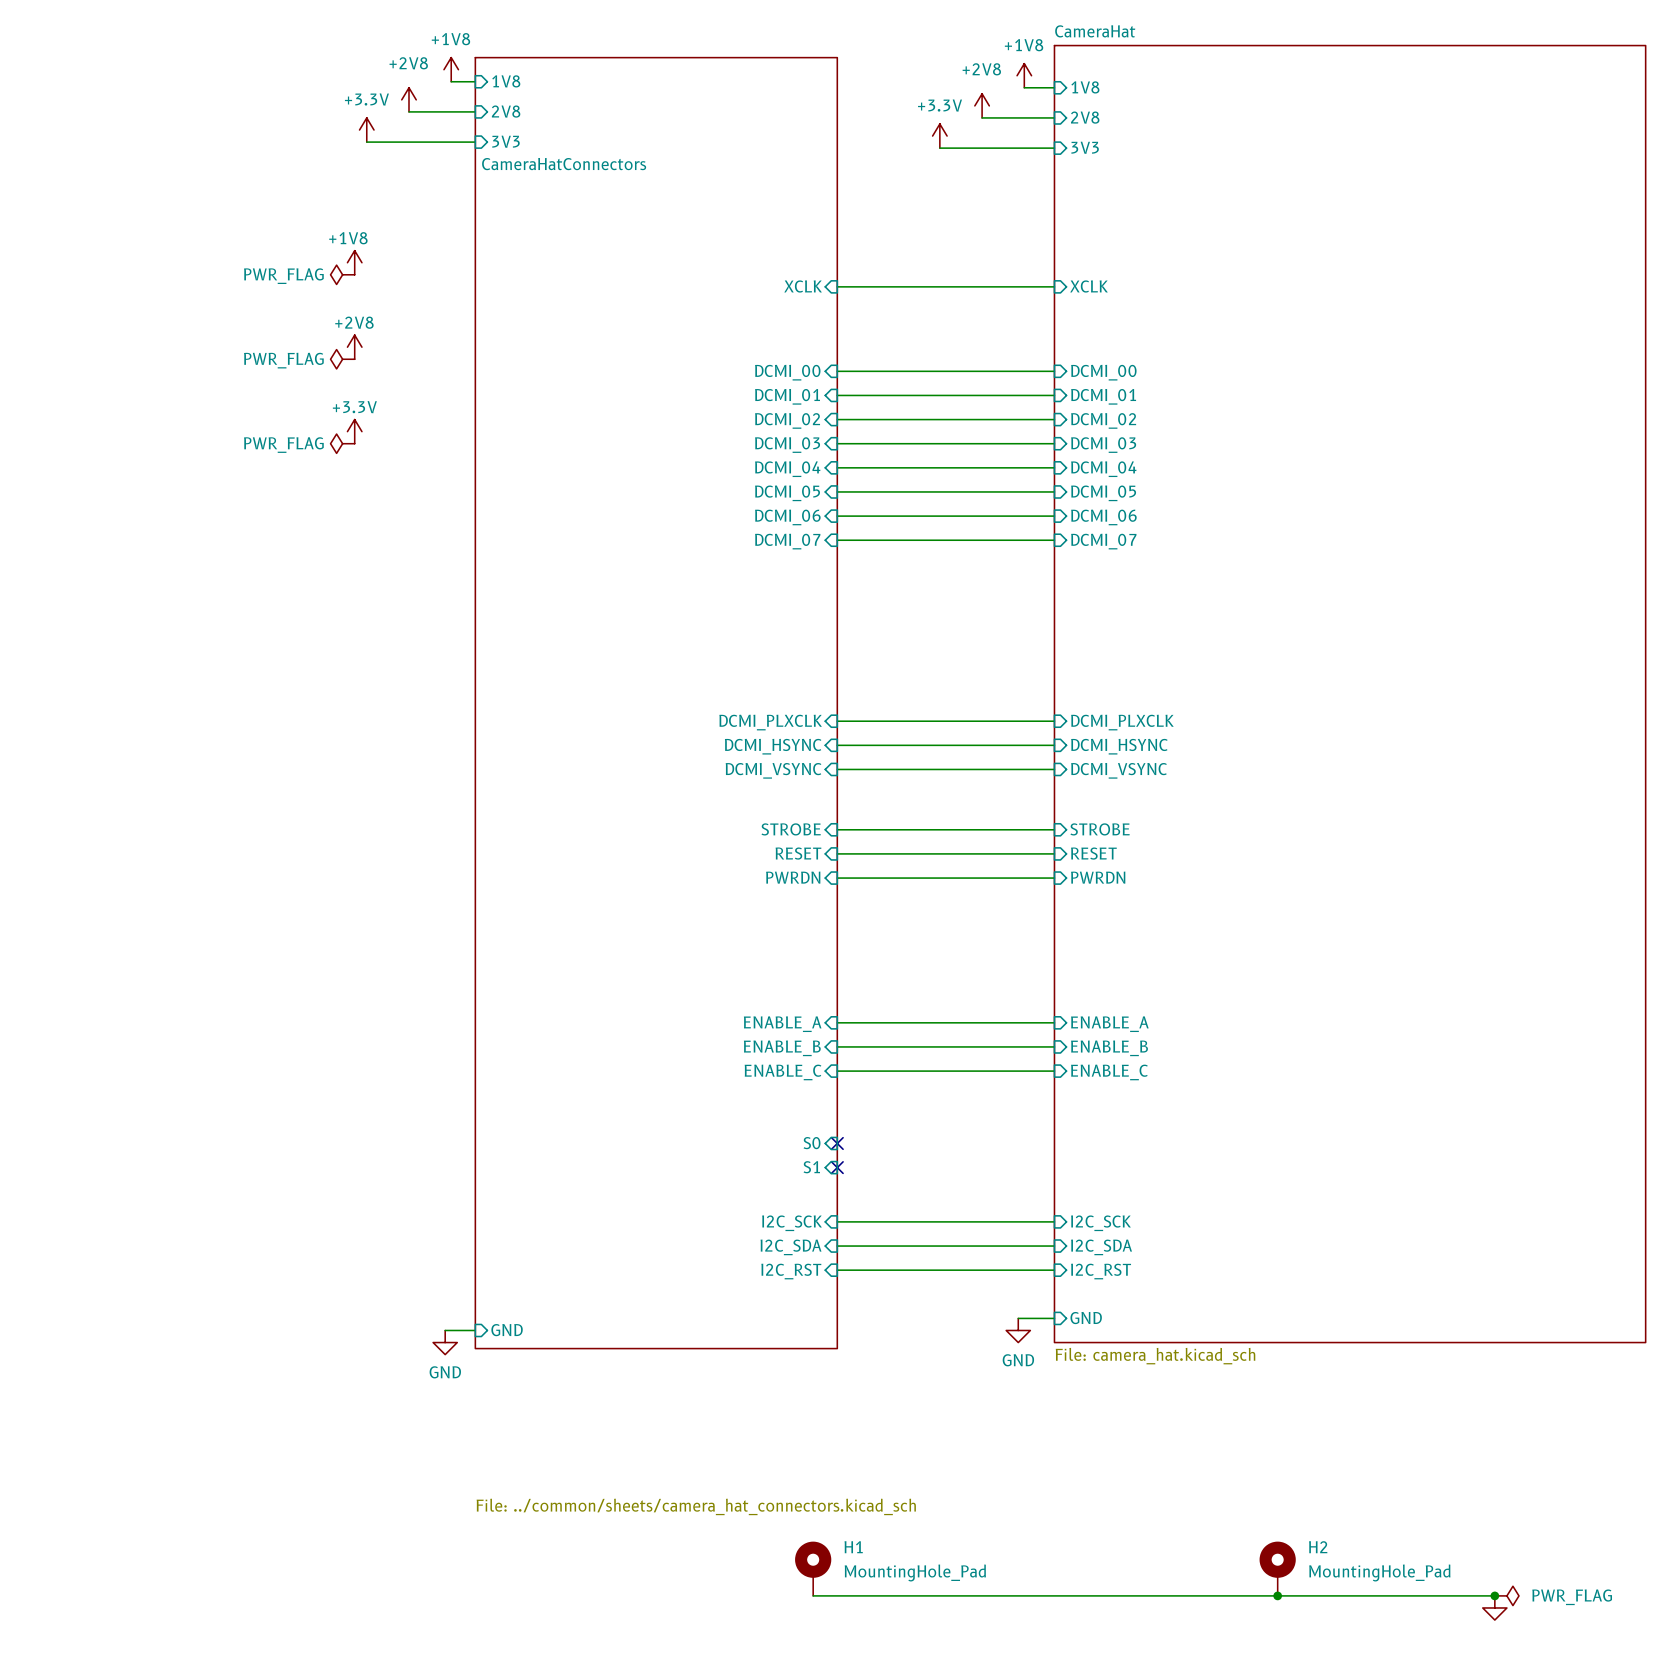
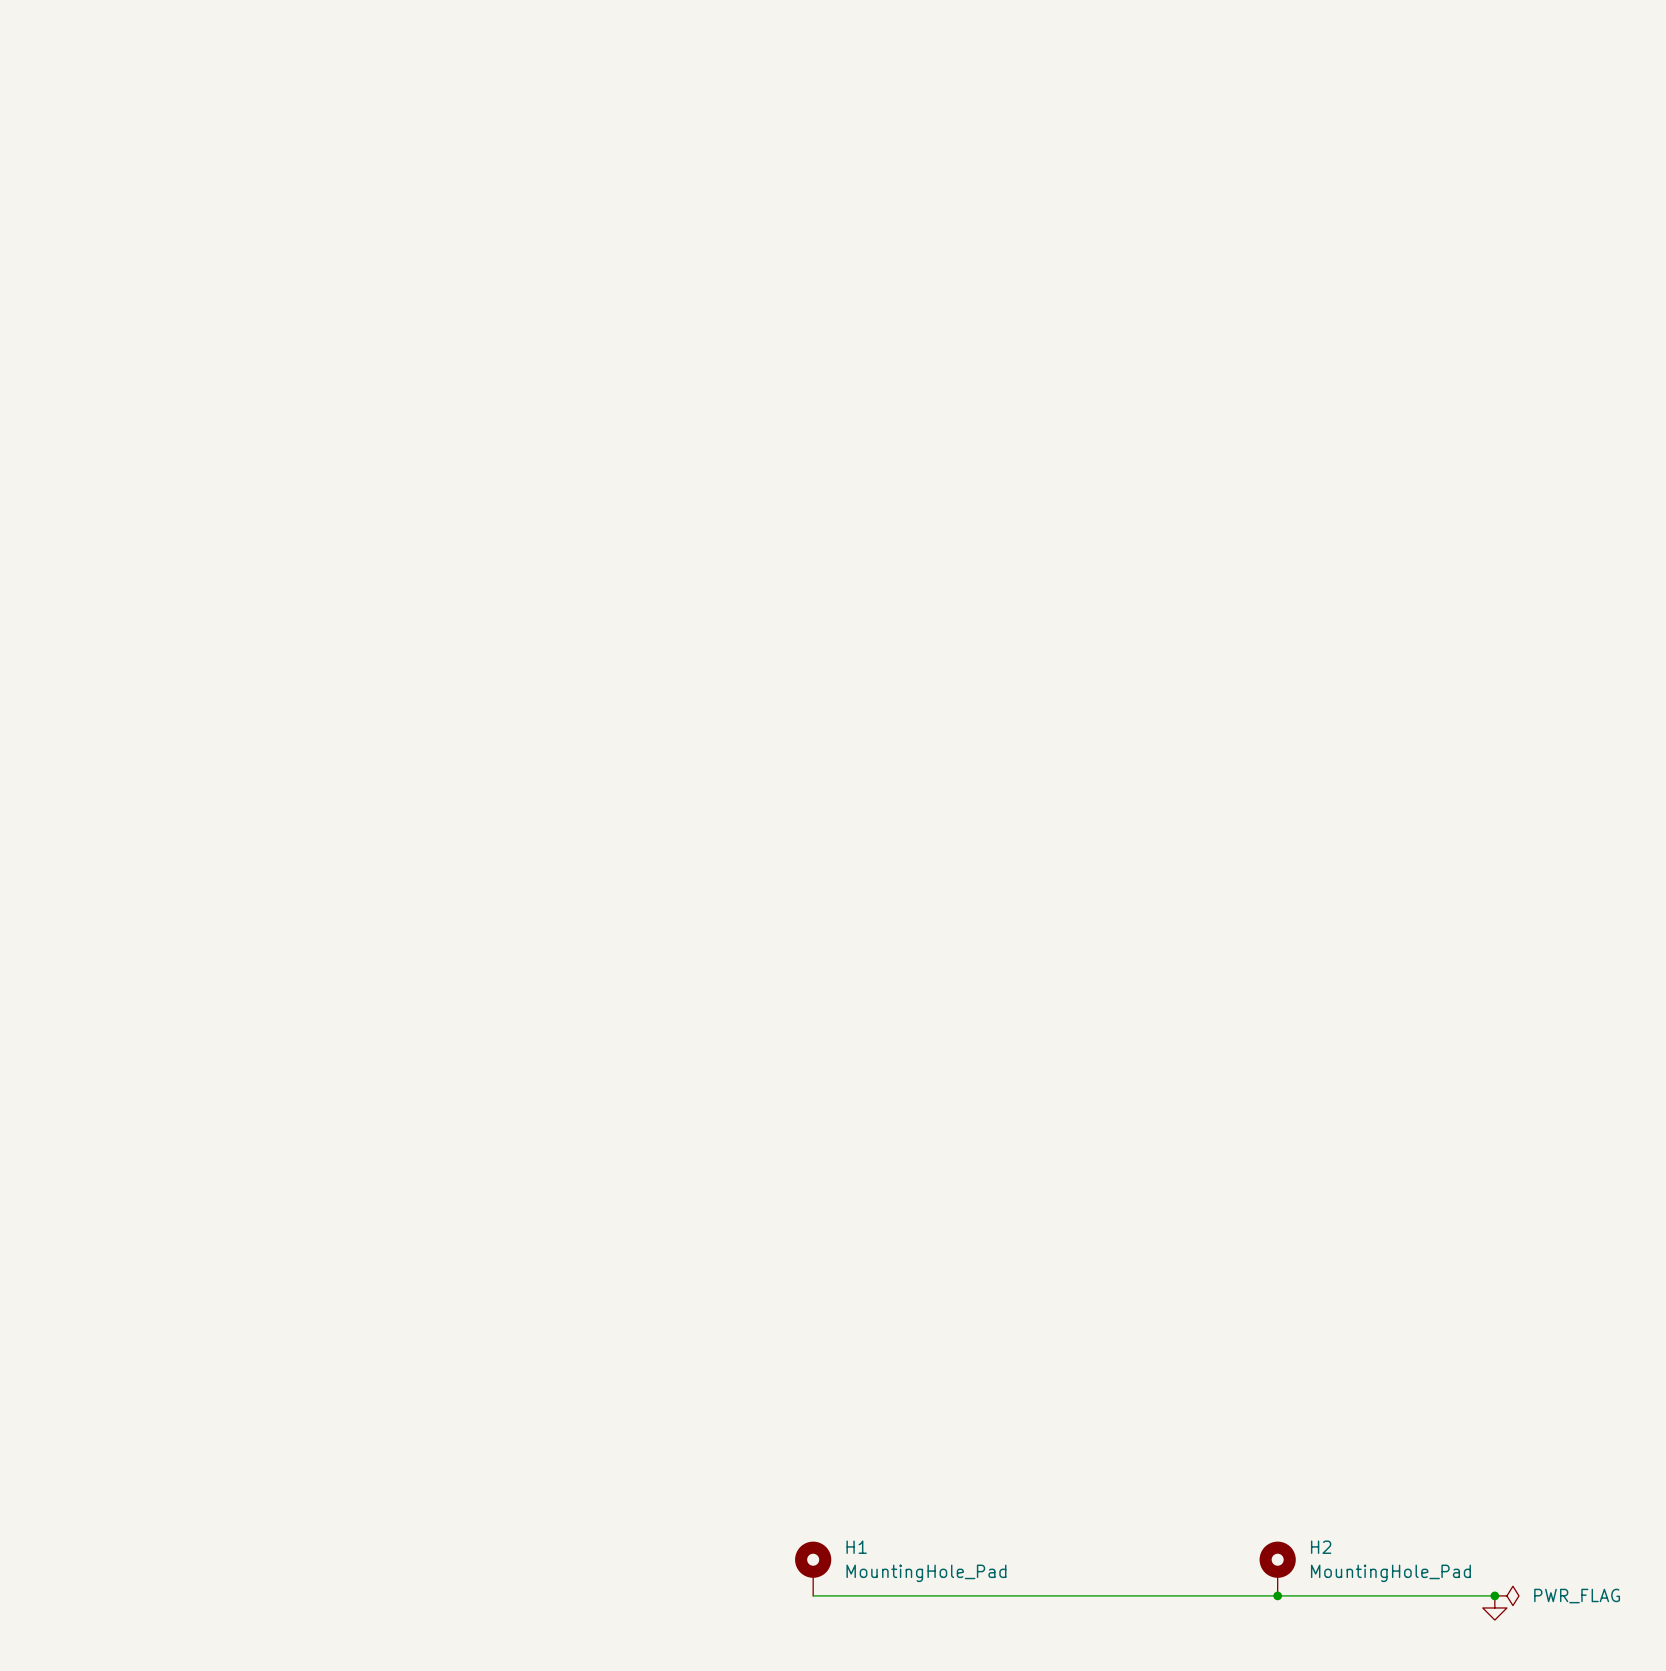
power symbol: +1V8 (451, 69) -> none
power symbol: +1V8 (1024, 75) -> none
wire: (451, 81) (475, 81) -> none
sheet pin: 1V8 (506, 81) -> none
wire: (1024, 87) (1054, 87) -> none
sheet pin: 1V8 (1085, 87) -> none
power symbol: +2V8 (408, 99) -> none
power symbol: +2V8 (982, 105) -> none
wire: (408, 111) (475, 111) -> none
sheet pin: 2V8 (506, 111) -> none
wire: (982, 117) (1054, 117) -> none
sheet pin: 2V8 (1085, 117) -> none
power symbol: +3.3V (366, 130) -> none
power symbol: +3.3V (939, 136) -> none
sheet pin: 3V3 (505, 141) -> none
wire: (366, 142) (475, 142) -> none
sheet pin: 3V3 (1085, 147) -> none
wire: (939, 148) (1054, 148) -> none
power symbol: +1V8 (354, 262) -> none
power symbol: PWR_FLAG (342, 274) -> none
sheet pin: XCLK (803, 286) -> none
wire: (837, 286) (1054, 286) -> none
sheet pin: XCLK (1089, 286) -> none
power symbol: +2V8 (354, 347) -> none
power symbol: PWR_FLAG (342, 359) -> none
wire: (837, 371) (1054, 371) -> none
sheet pin: DCMI_00 (787, 372) -> none
sheet pin: DCMI_00 (1103, 372) -> none
wire: (837, 395) (1054, 395) -> none
sheet pin: DCMI_01 (787, 396) -> none
sheet pin: DCMI_01 (1103, 396) -> none
wire: (837, 419) (1054, 419) -> none
sheet pin: DCMI_02 (787, 420) -> none
sheet pin: DCMI_02 (1103, 420) -> none
power symbol: +3.3V (354, 431) -> none
power symbol: PWR_FLAG (342, 443) -> none
wire: (837, 443) (1054, 443) -> none
sheet pin: DCMI_03 (787, 445) -> none
sheet pin: DCMI_03 (1103, 445) -> none
wire: (837, 467) (1054, 467) -> none
sheet pin: DCMI_04 (787, 469) -> none
sheet pin: DCMI_04 (1103, 469) -> none
wire: (837, 491) (1054, 491) -> none
sheet pin: DCMI_05 (787, 493) -> none
sheet pin: DCMI_05 (1103, 493) -> none
wire: (837, 516) (1054, 516) -> none
sheet pin: DCMI_06 (787, 517) -> none
sheet pin: DCMI_06 (1103, 517) -> none
wire: (837, 540) (1054, 540) -> none
sheet pin: DCMI_07 (787, 541) -> none
sheet pin: DCMI_07 (1103, 541) -> none
sheet CameraHat: File: camera_hat.kicad_sch (1350, 694) -> none
sheet CameraHatConnectors: File: ../common/sheets/camera_hat_connectors.kicad_sch (656, 703) -> none
wire: (837, 721) (1054, 721) -> none
sheet pin: DCMI_PLXCLK (770, 722) -> none
sheet pin: DCMI_PLXCLK (1122, 722) -> none
wire: (837, 745) (1054, 745) -> none
sheet pin: DCMI_HSYNC (773, 746) -> none
sheet pin: DCMI_HSYNC (1119, 746) -> none
wire: (837, 769) (1054, 769) -> none
sheet pin: DCMI_VSYNC (773, 770) -> none
sheet pin: DCMI_VSYNC (1118, 770) -> none
sheet pin: STROBE (791, 829) -> none
wire: (837, 829) (1054, 829) -> none
sheet pin: STROBE (1100, 829) -> none
sheet pin: RESET (798, 853) -> none
wire: (837, 853) (1054, 853) -> none
sheet pin: RESET (1093, 853) -> none
sheet pin: PWRDN (793, 877) -> none
sheet pin: PWRDN (1098, 877) -> none
wire: (837, 878) (1054, 878) -> none
wire: (837, 1022) (1054, 1022) -> none
sheet pin: ENABLE_A (782, 1024) -> none
sheet pin: ENABLE_A (1109, 1024) -> none
wire: (837, 1046) (1054, 1046) -> none
sheet pin: ENABLE_B (782, 1048) -> none
sheet pin: ENABLE_B (1109, 1048) -> none
wire: (837, 1071) (1054, 1071) -> none
sheet pin: ENABLE_C (783, 1072) -> none
sheet pin: ENABLE_C (1109, 1072) -> none
sheet pin: S0 (812, 1143) -> none
no-connect mark: (837, 1143) -> none
sheet pin: S1 (811, 1167) -> none
no-connect mark: (837, 1167) -> none
wire: (837, 1221) (1054, 1221) -> none
sheet pin: I2C_SCK (792, 1223) -> none
sheet pin: I2C_SCK (1100, 1223) -> none
wire: (837, 1246) (1054, 1246) -> none
sheet pin: I2C_SDA (791, 1247) -> none
sheet pin: I2C_SDA (1101, 1247) -> none
wire: (837, 1270) (1054, 1270) -> none
sheet pin: I2C_RST (791, 1271) -> none
sheet pin: I2C_RST (1101, 1271) -> none
wire: (1018, 1318) (1054, 1318) -> none
sheet pin: GND (1086, 1318) -> none
wire: (445, 1330) (475, 1330) -> none
sheet pin: GND (507, 1330) -> none
power symbol: GND (1018, 1330) -> none
power symbol: GND (445, 1342) -> none

